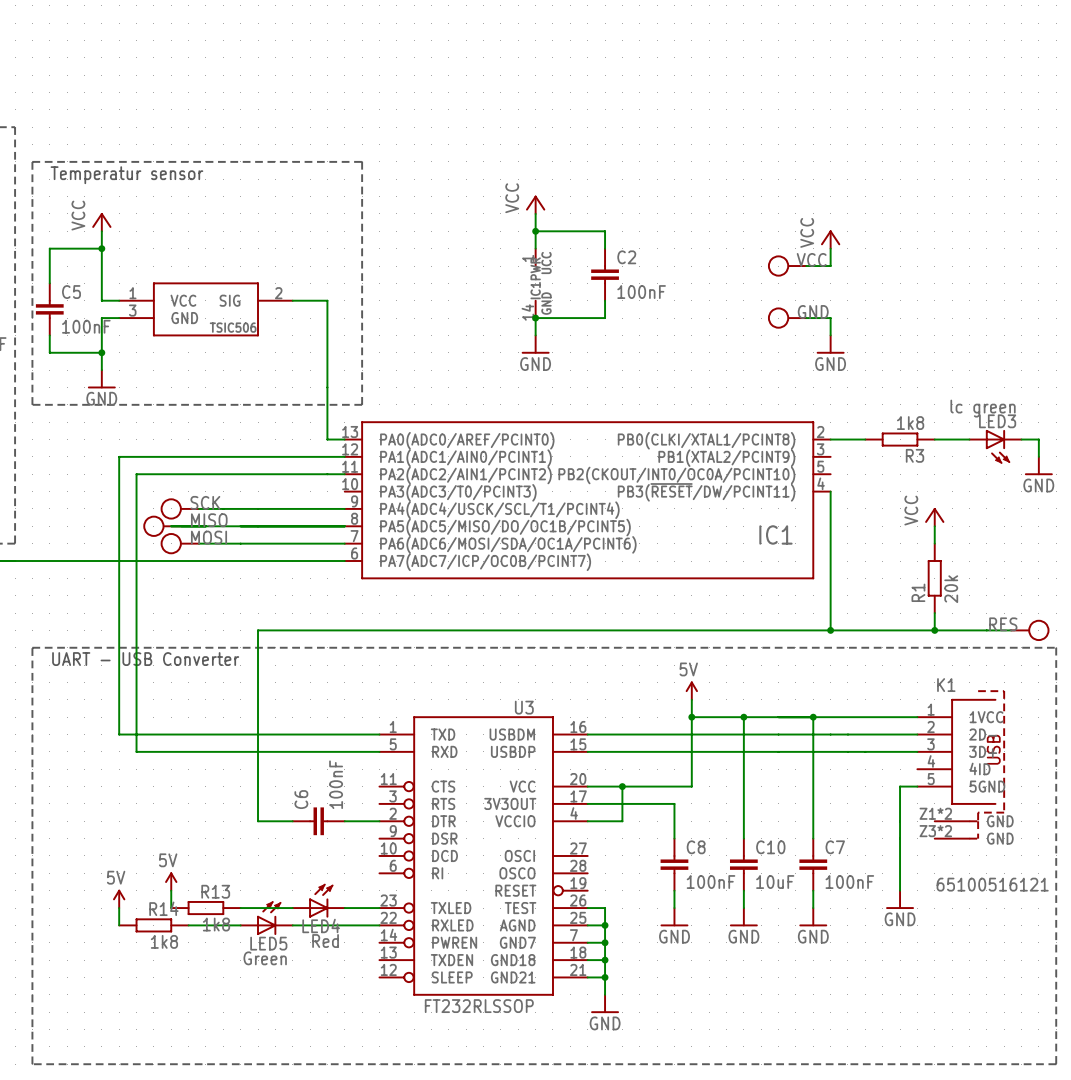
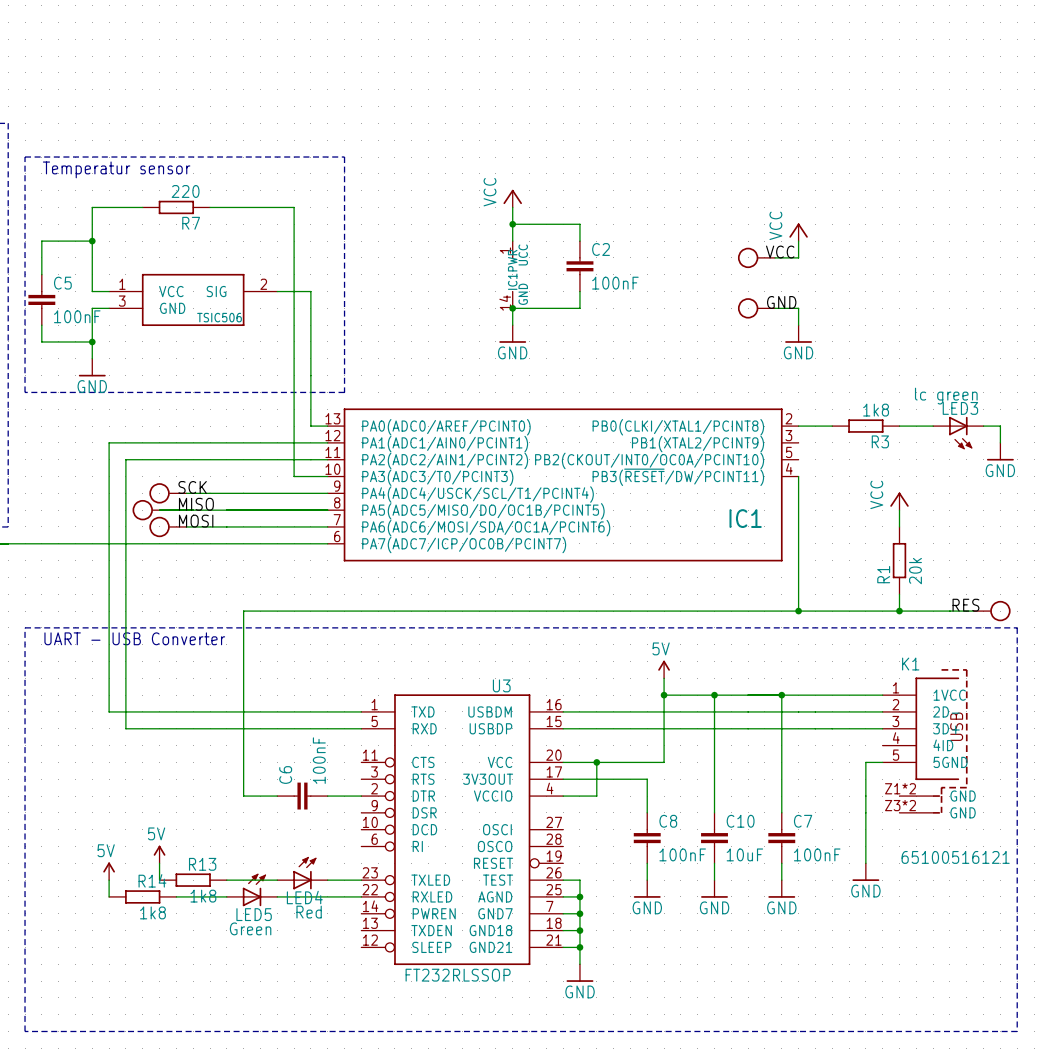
wire: none -> (142, 207) (92, 207) (92, 224)
R7: none -> 220 (176, 207)
wire: none -> (210, 207) (294, 207) (294, 476) (327, 476)
power symbol: VCC (101, 222) -> none

